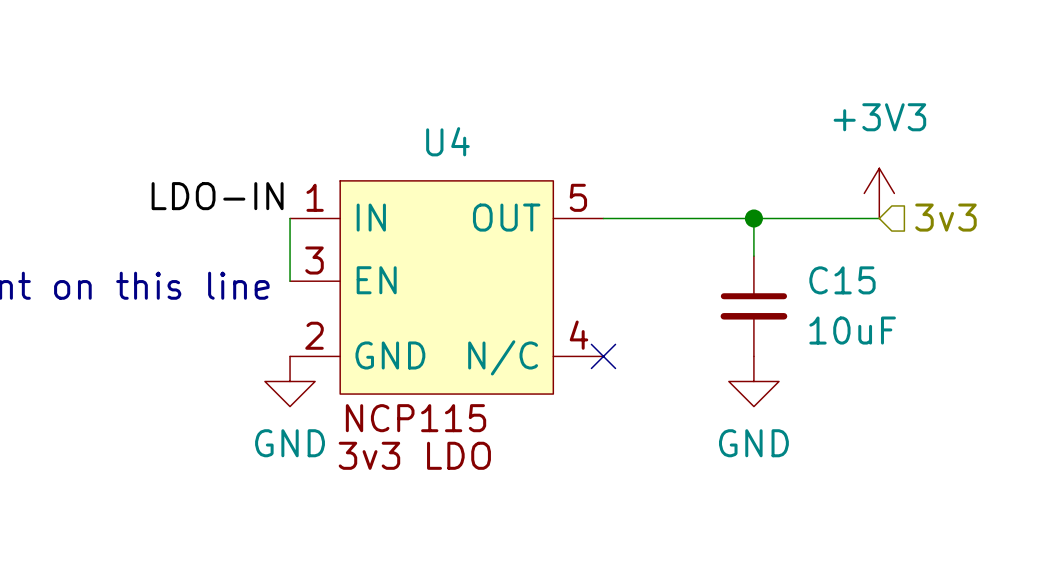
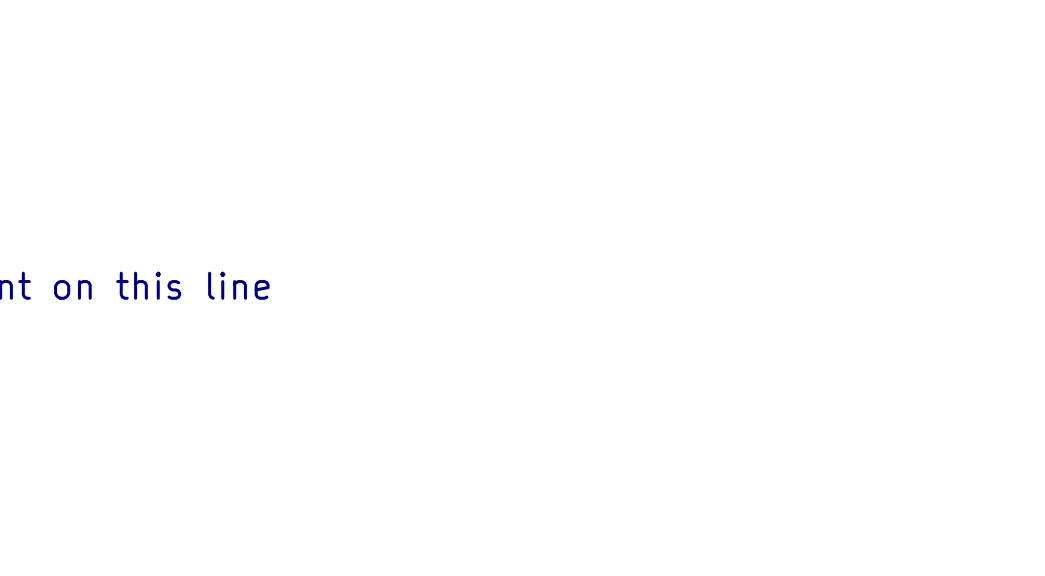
power symbol: +3V3 (879, 193) -> none
label: LDO-IN (217, 196) -> none
hierarchical label: 3v3 (945, 217) -> none
wire: (290, 218) (290, 281) -> none
wire: (603, 218) (879, 218) -> none
wire: (753, 218) (753, 256) -> none
junction: (753, 218) -> none
U4: (446, 287) -> none
C15: 10uF (753, 306) -> none
no-connect mark: (603, 356) -> none
power symbol: GND (290, 381) -> none
power symbol: GND (753, 381) -> none

